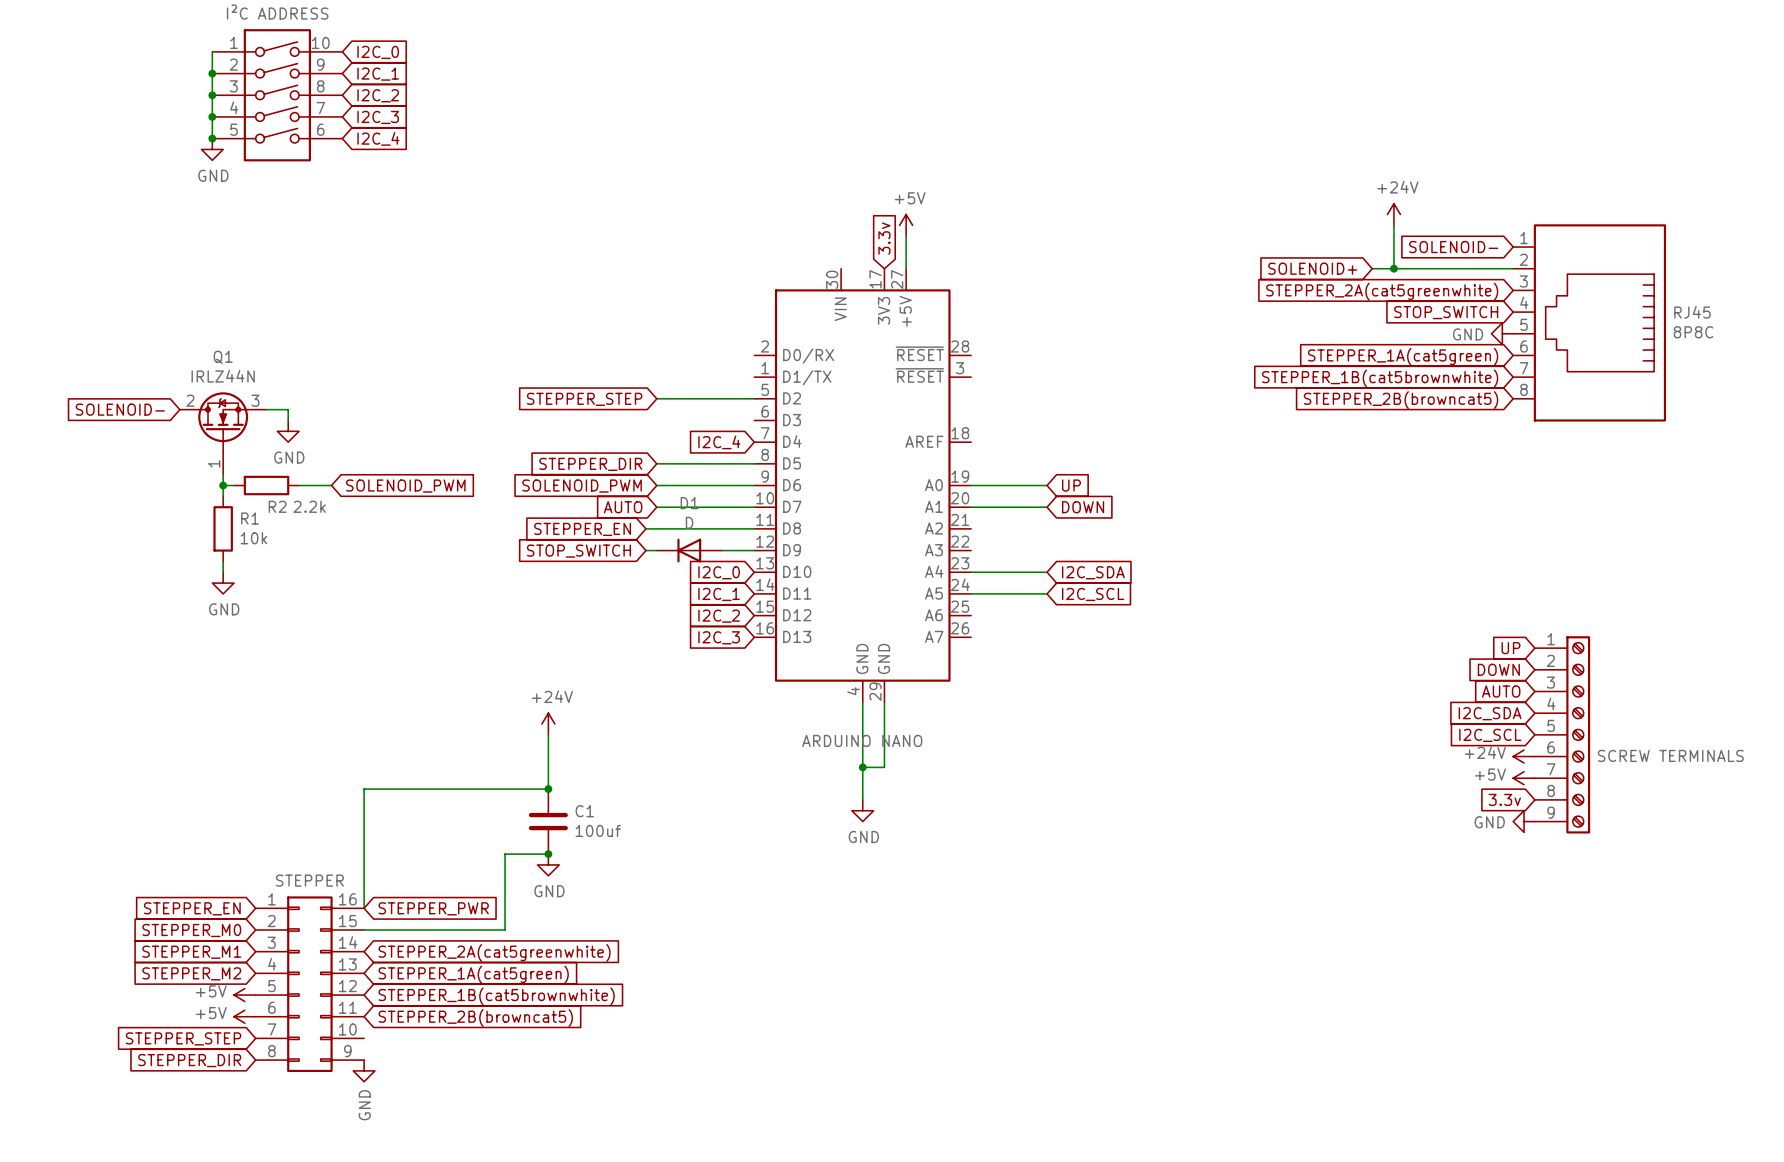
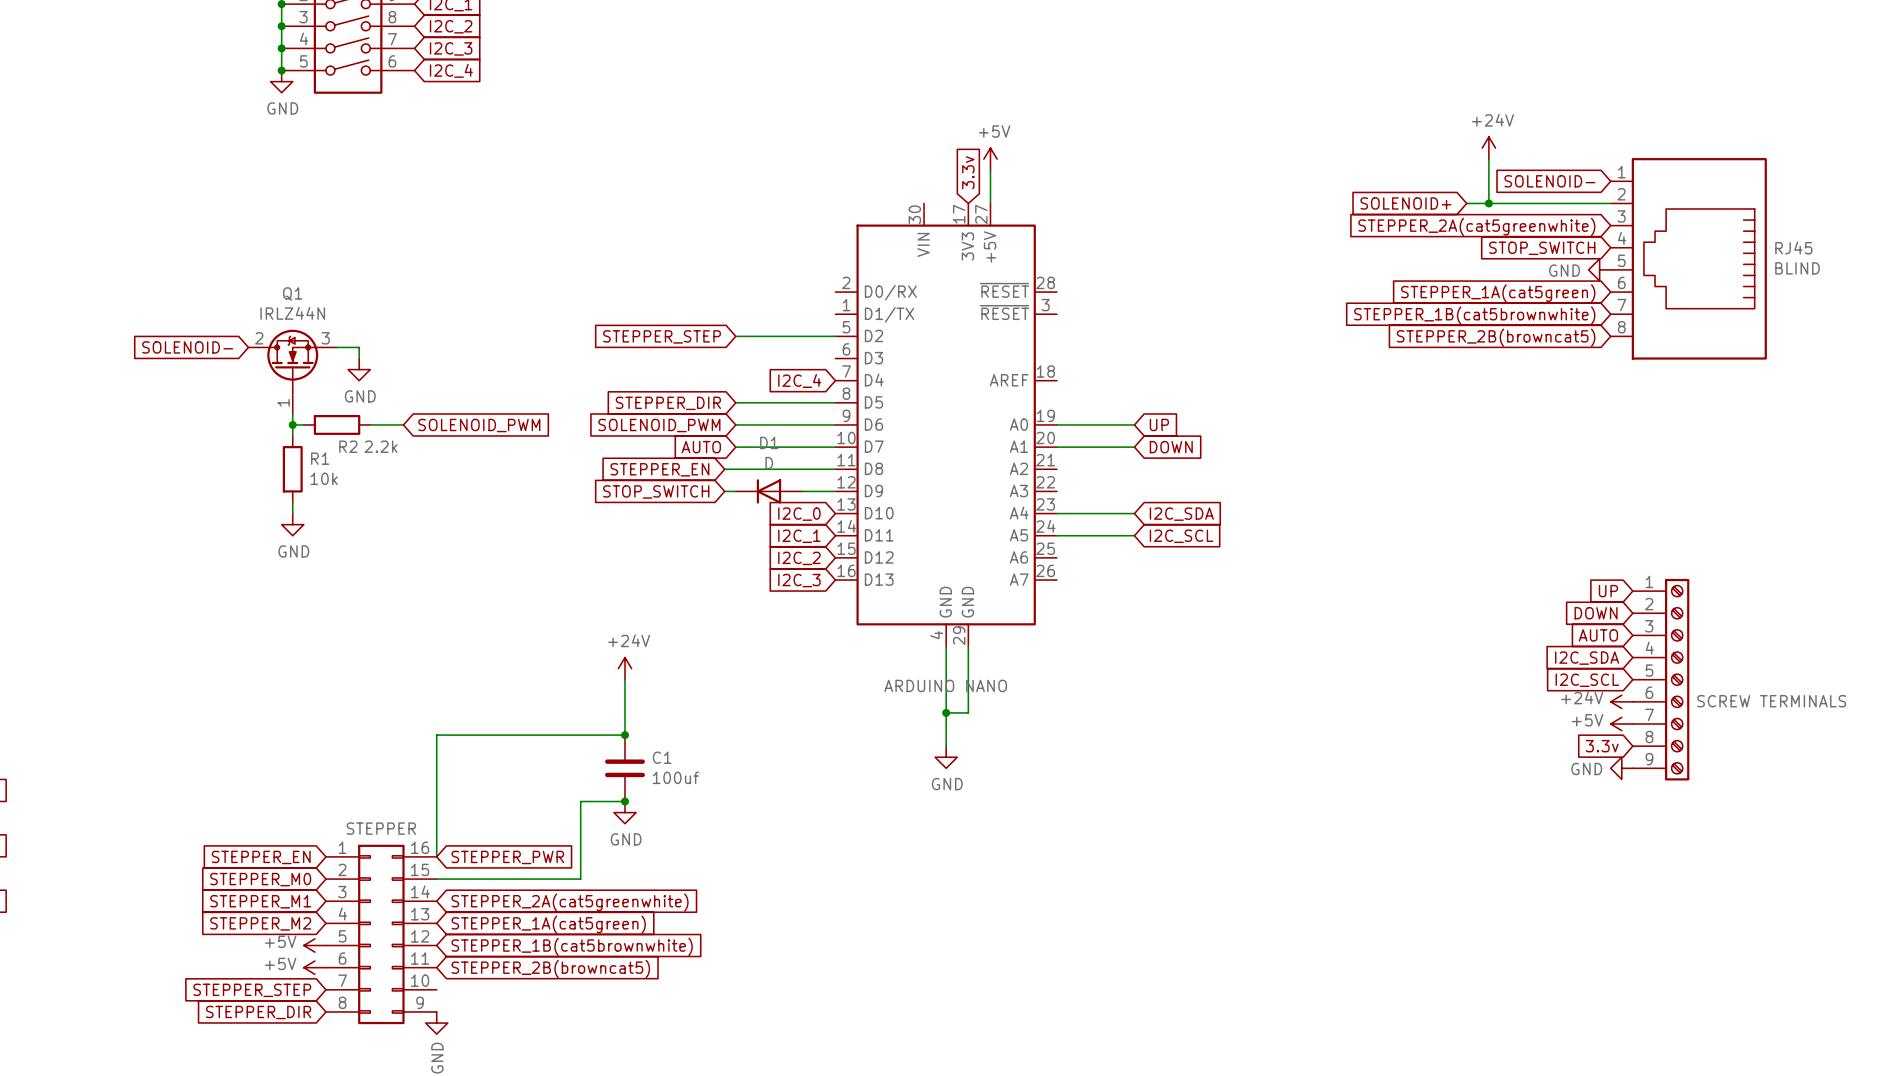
RJ45 value: 8P8C (1693, 332) -> BLIND (1797, 268)

